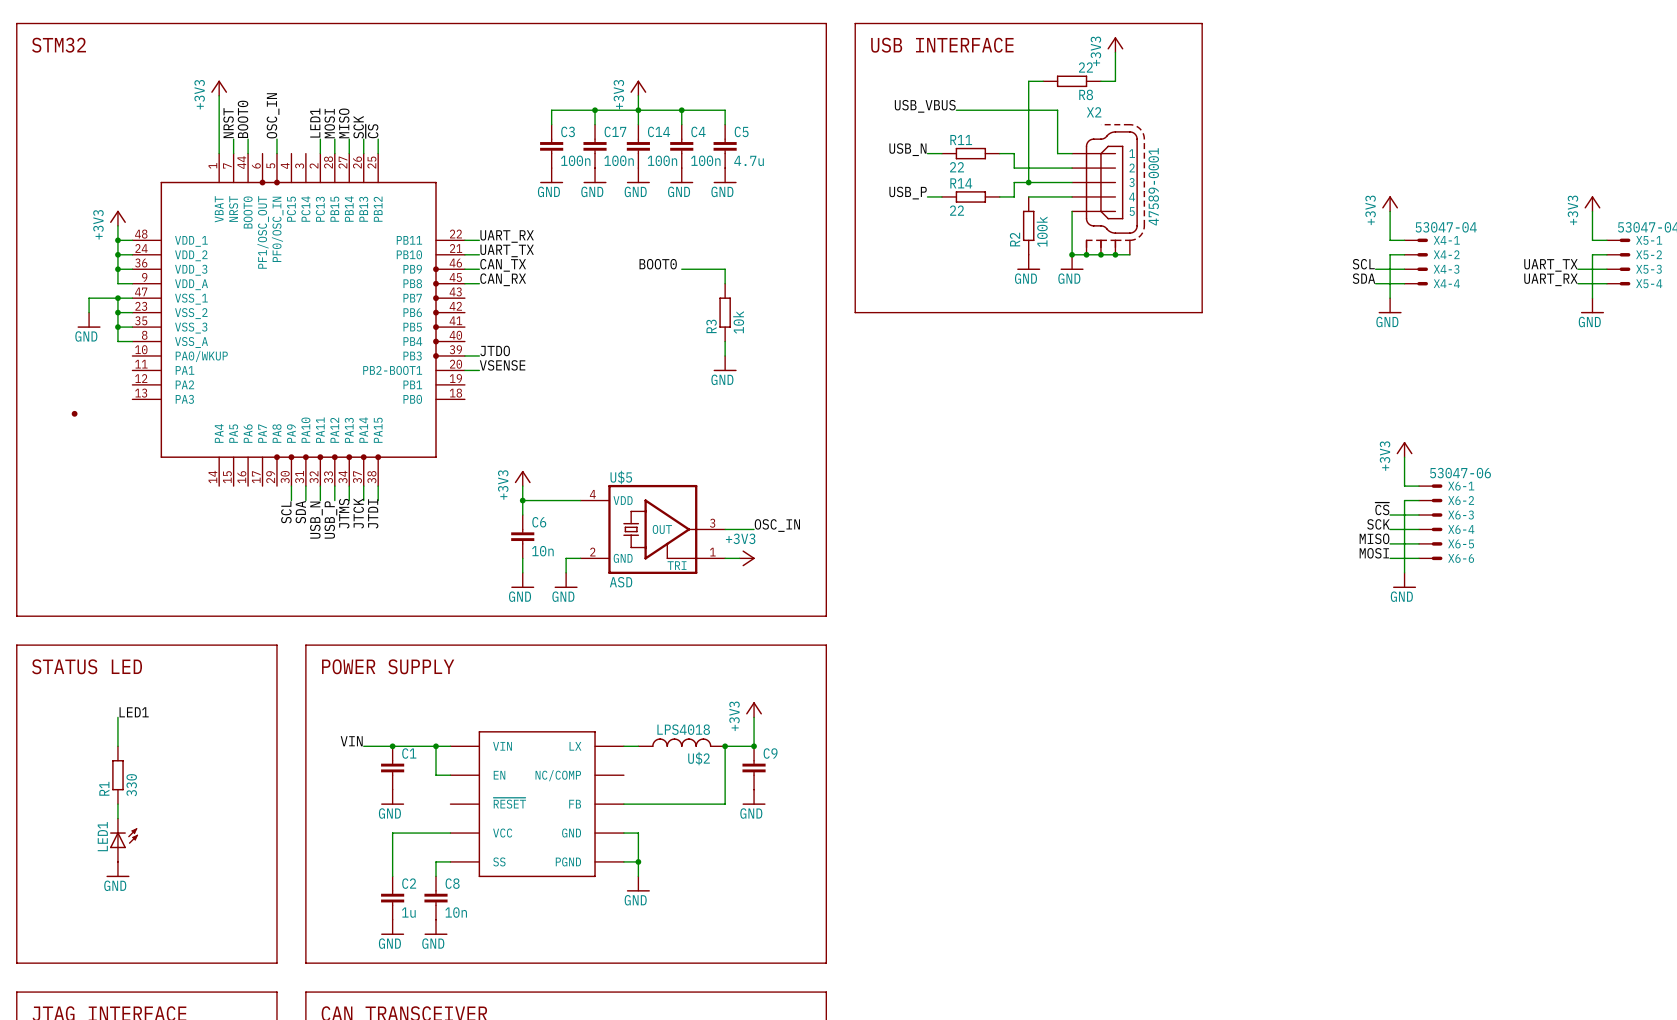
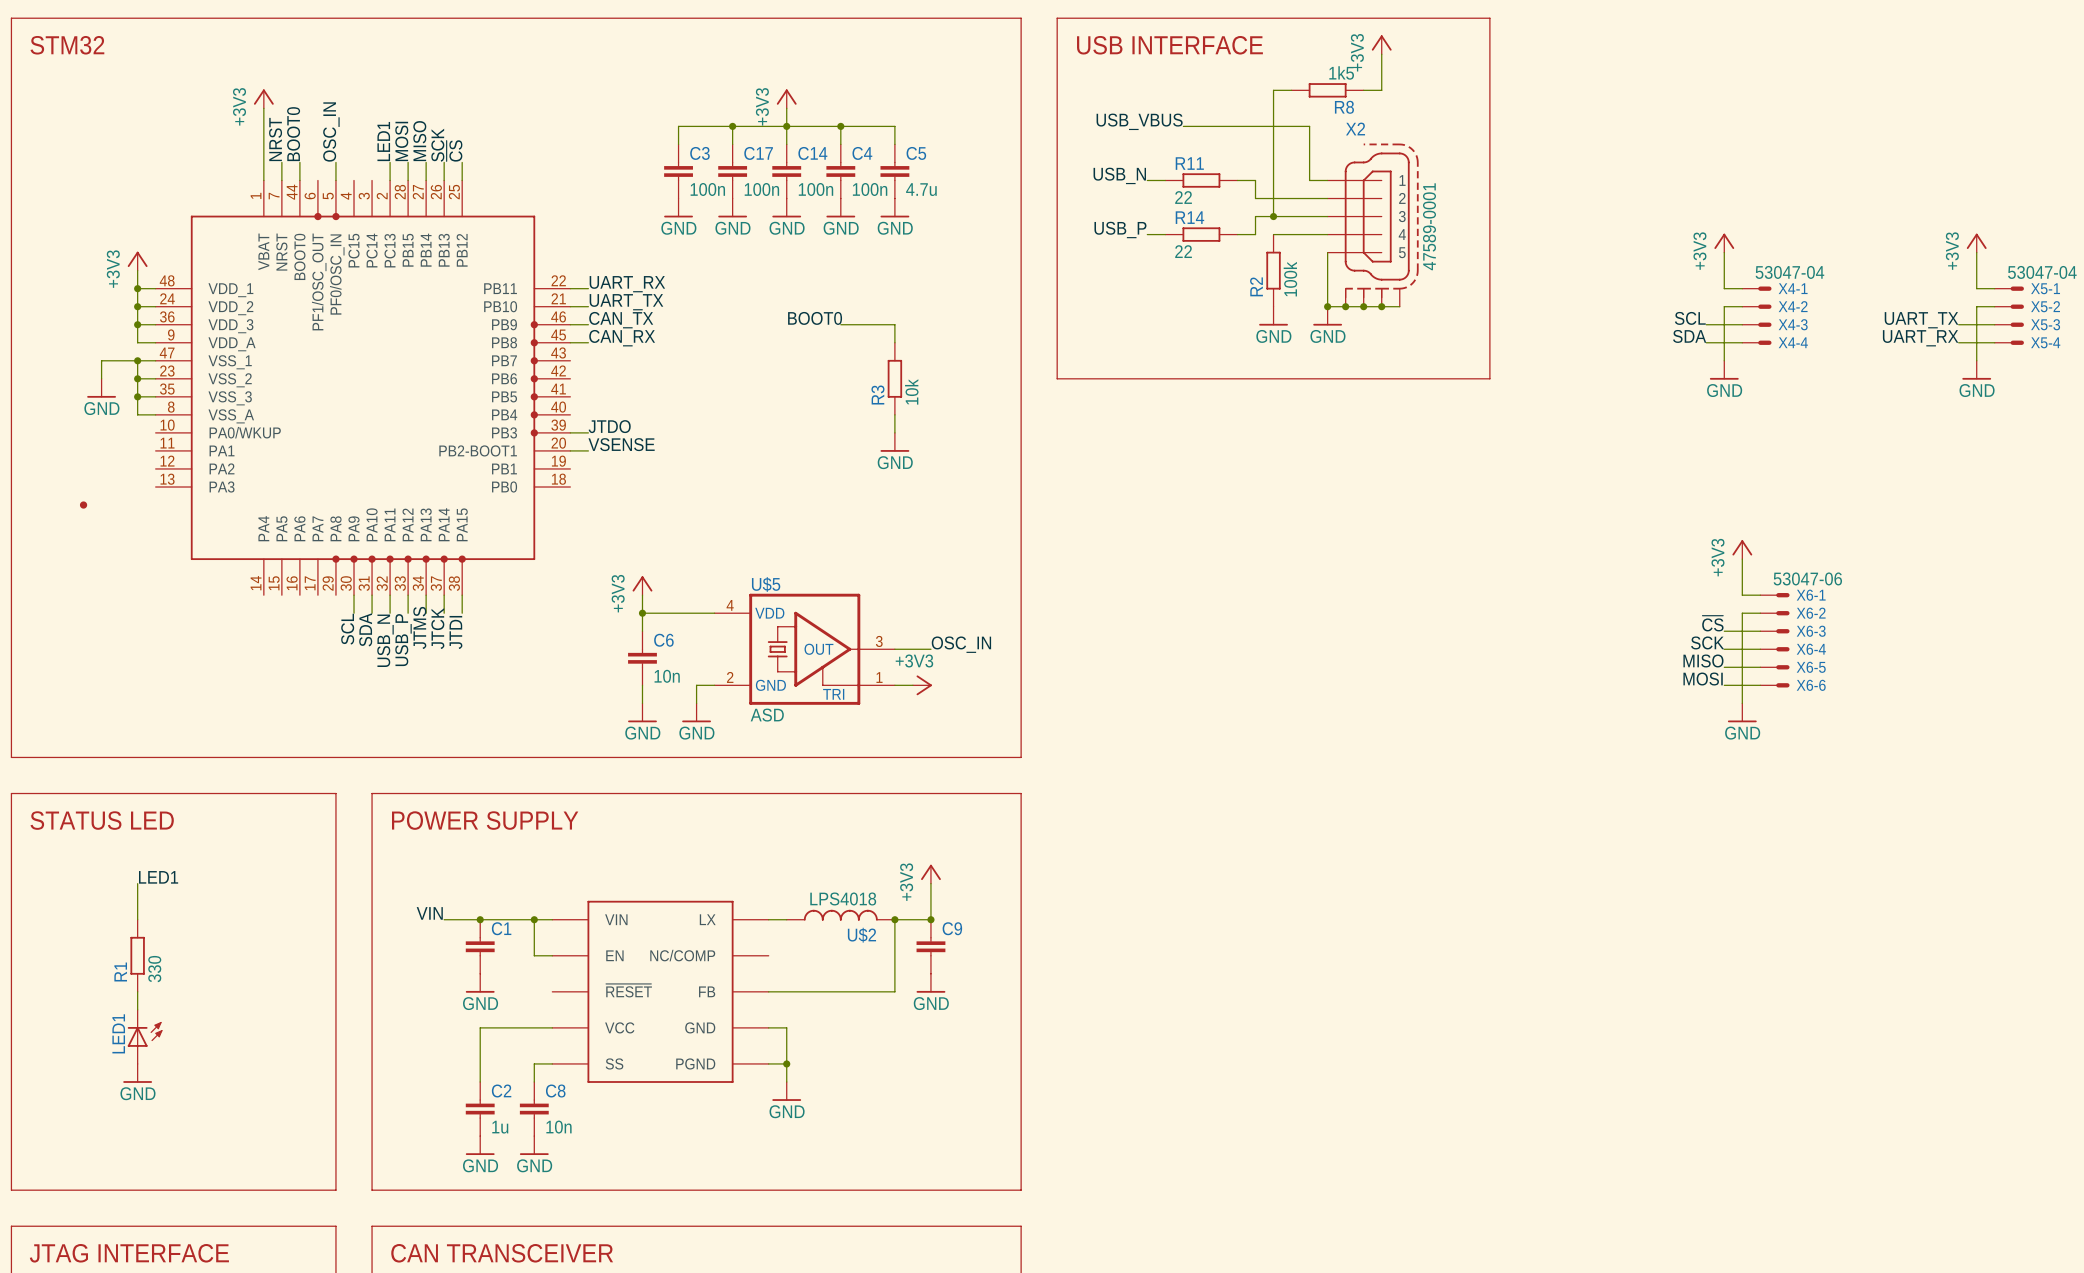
R8 value: 22 (1085, 67) -> 1k5 (1341, 72)

